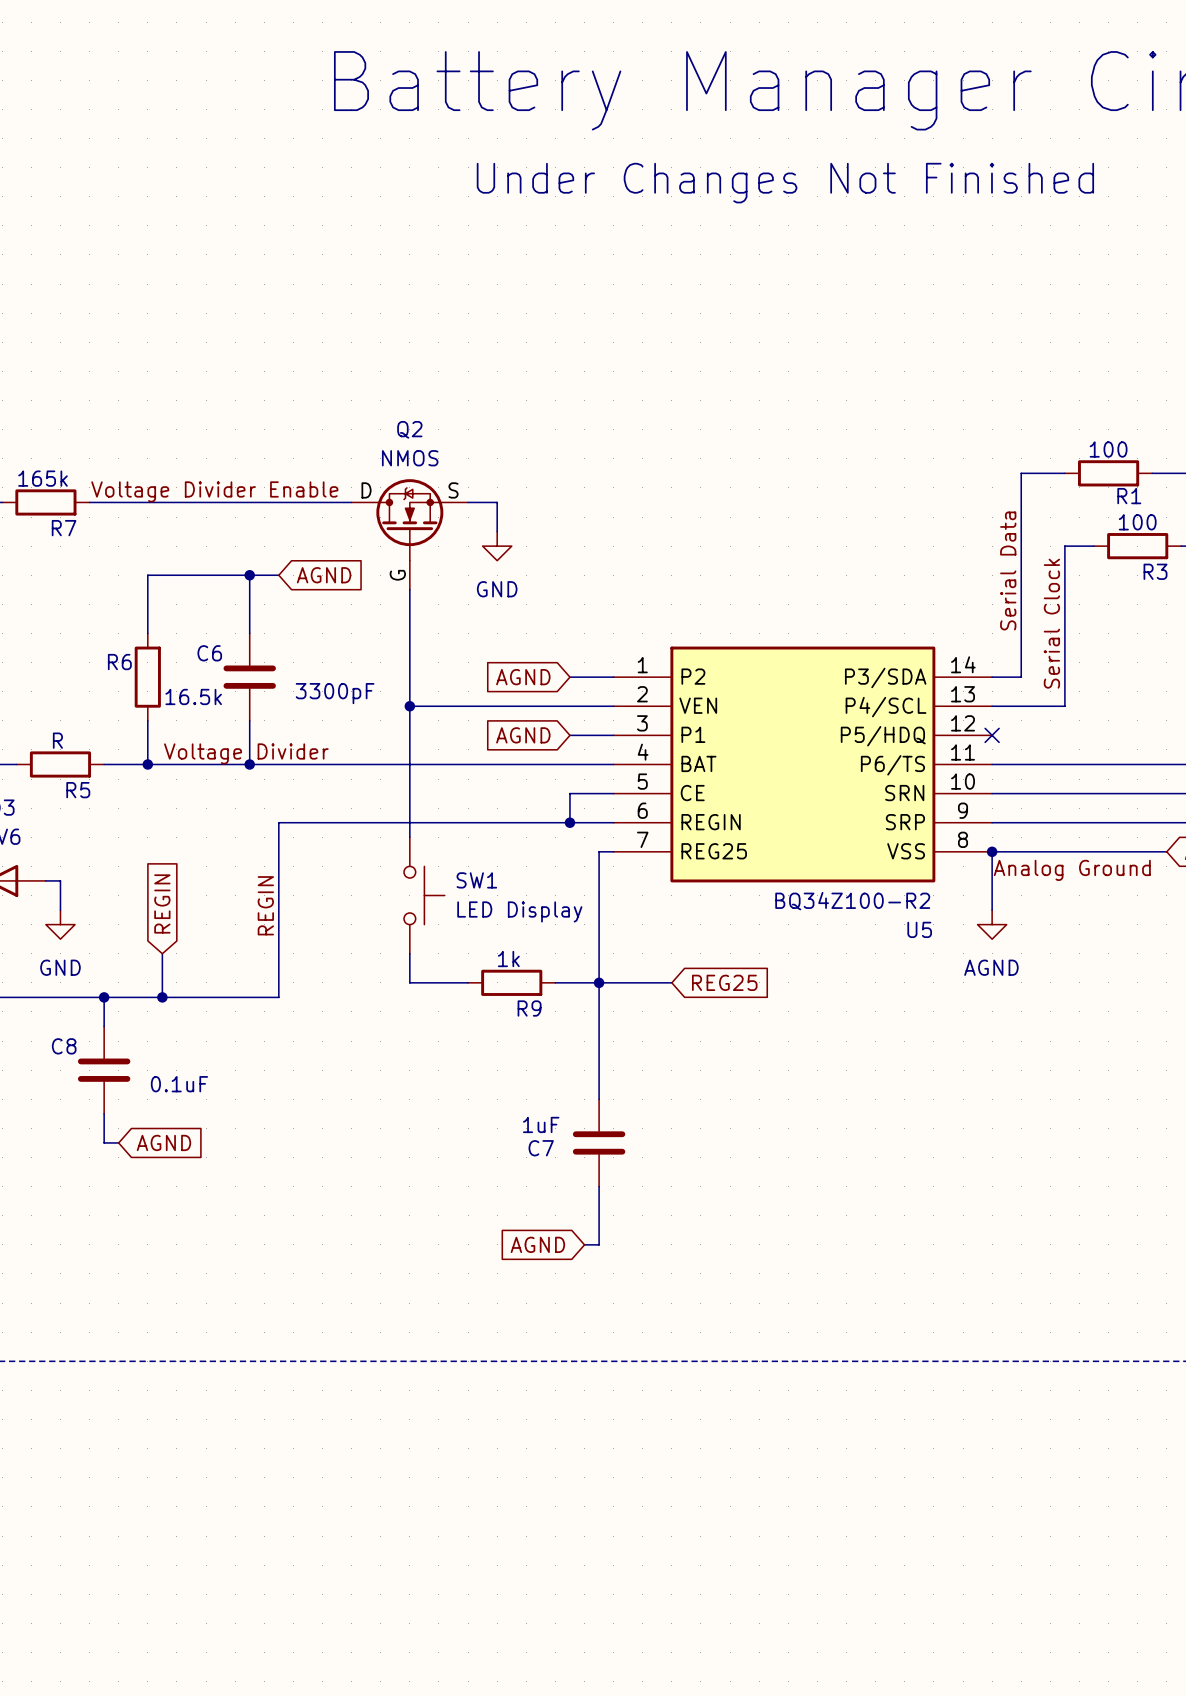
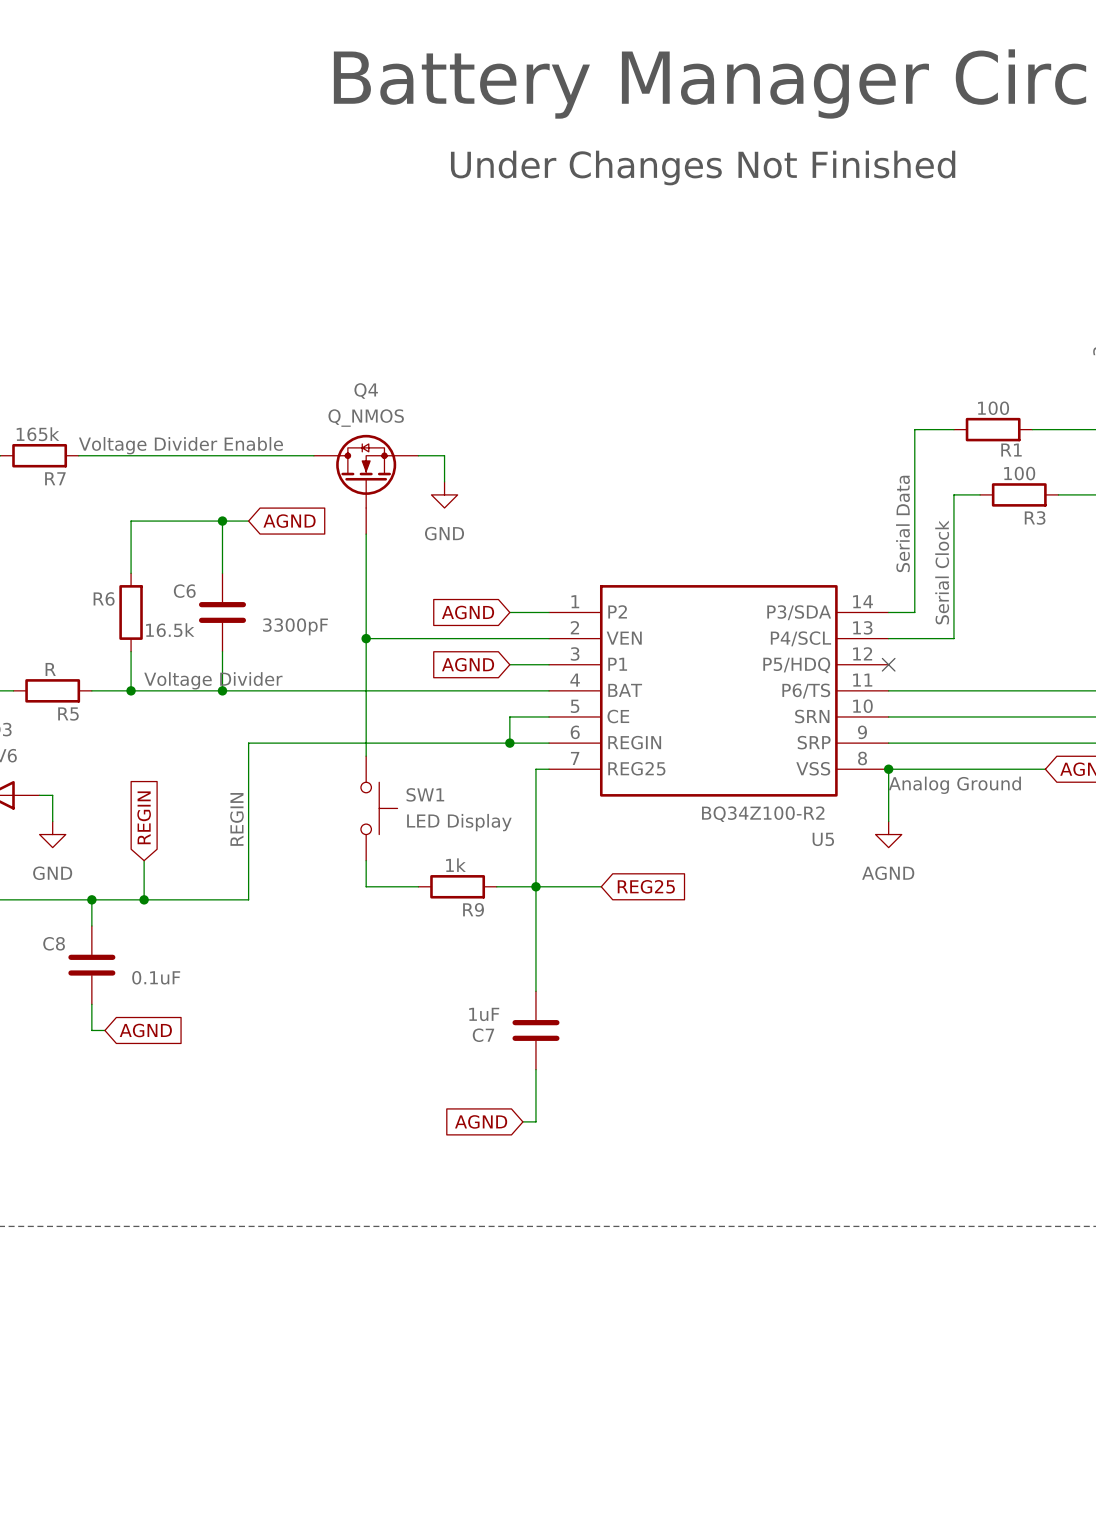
Q2: NMOS (409, 534) -> none
Q4: none -> Q_NMOS (366, 484)

